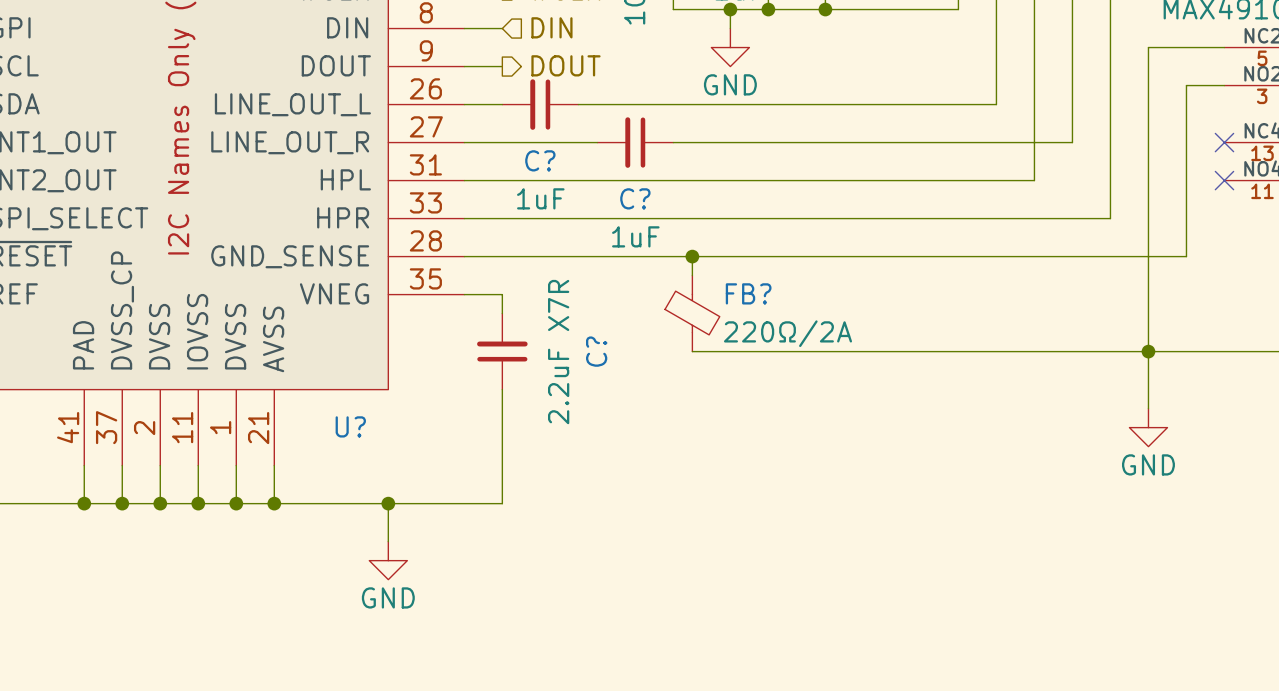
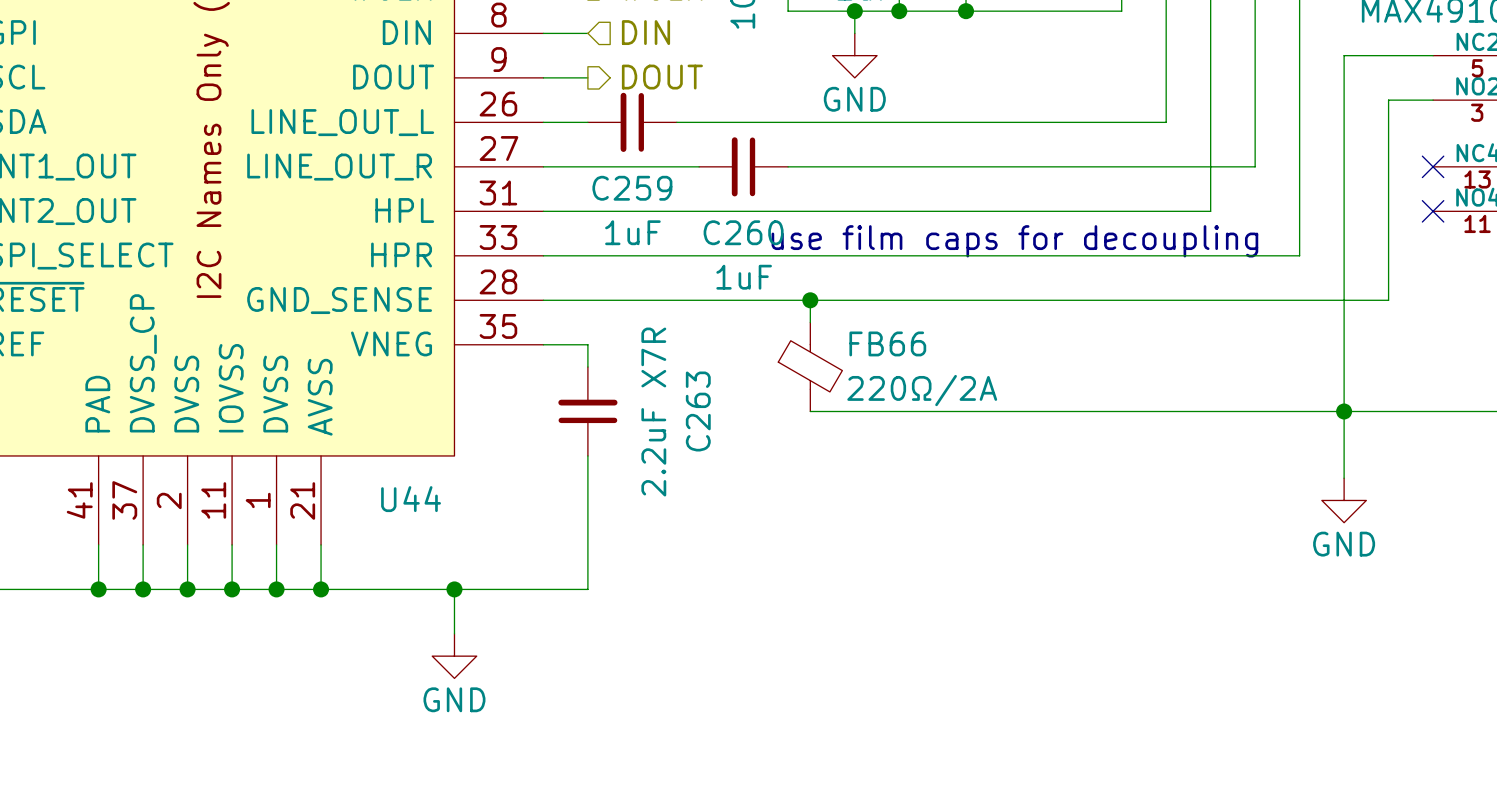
C? name: C? (540, 160) -> C259 (632, 188)
C? name: C? (635, 198) -> C260 (743, 232)
text: none -> use film caps for decoupling (1014, 241)
FB? name: FB? (748, 293) -> FB66 (887, 343)
C? name: C? (596, 351) -> C263 (698, 411)
U? name: U? (350, 426) -> U44 (411, 499)

